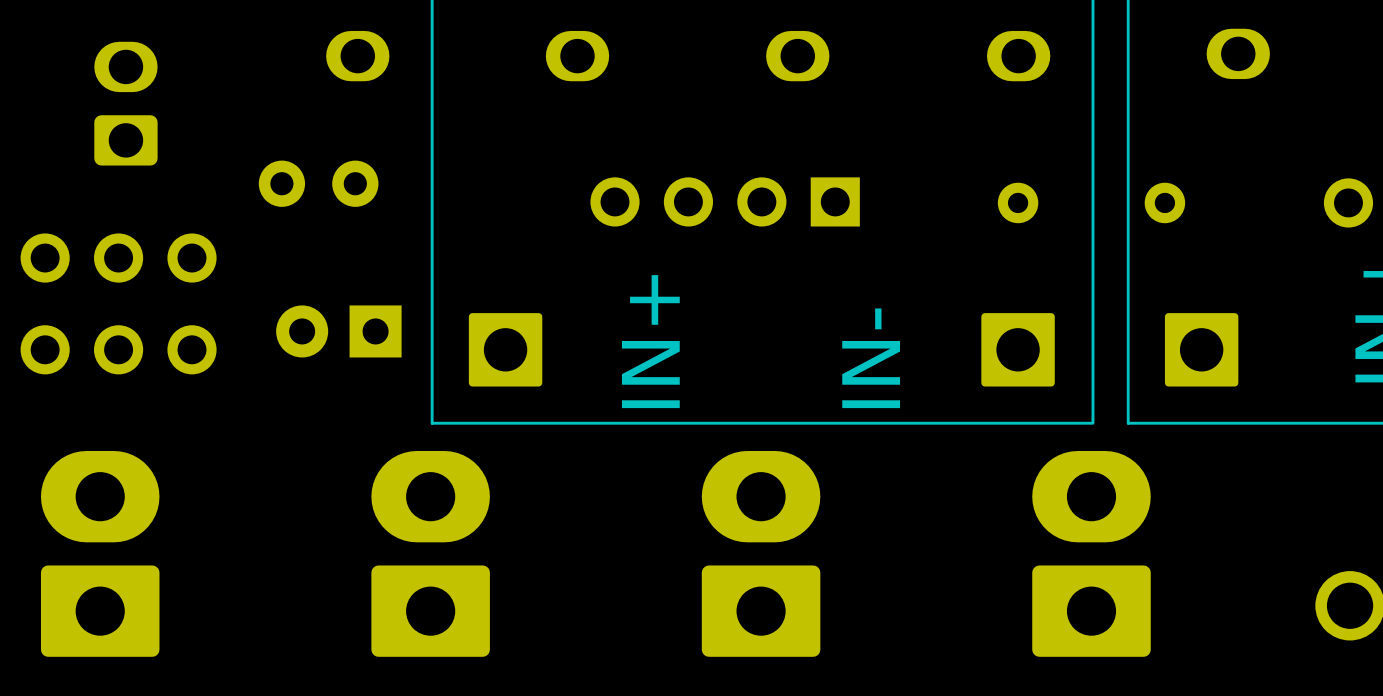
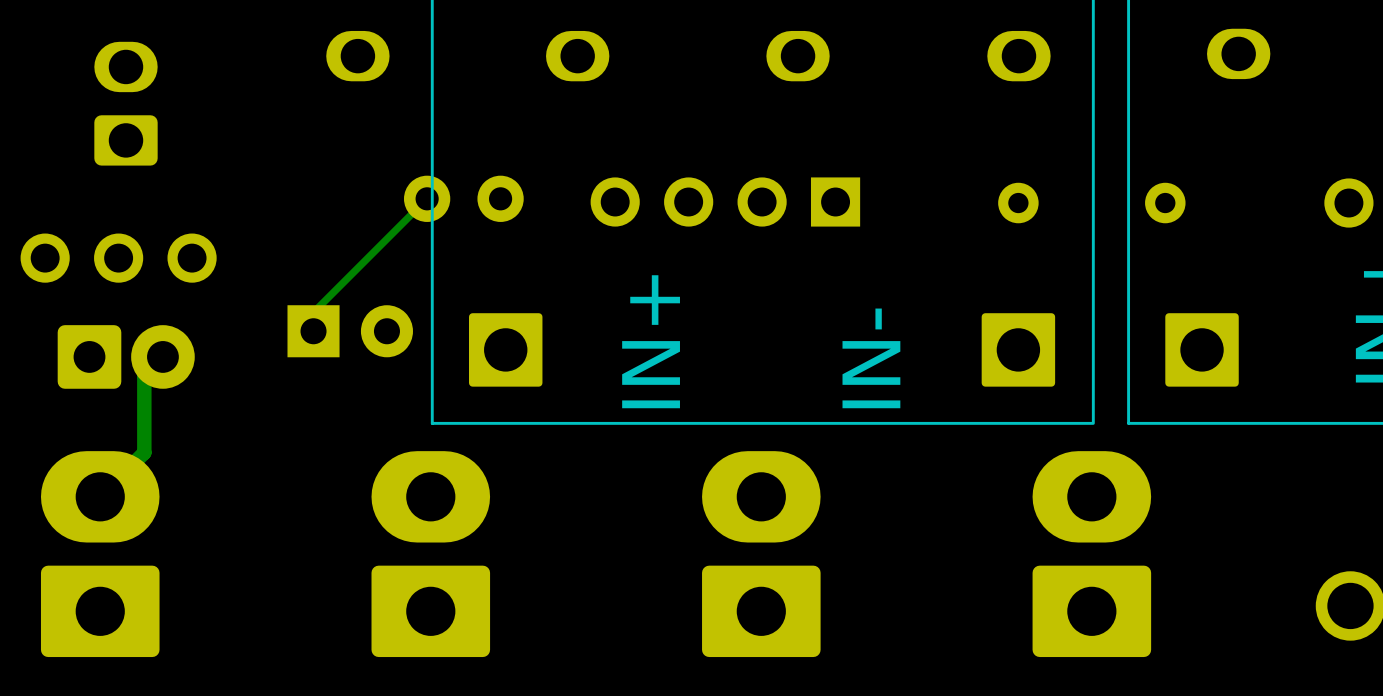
part position: (318, 183) -> (463, 198)
track: none -> (427, 198) (313, 312) (313, 331)
part footprint: [20, 325, 217, 375] -> [57, 325, 195, 389]
part rotation: 0° (338, 331) -> 180° (350, 331)
track: none -> (162, 356) (144, 375) (144, 452) (100, 496)

